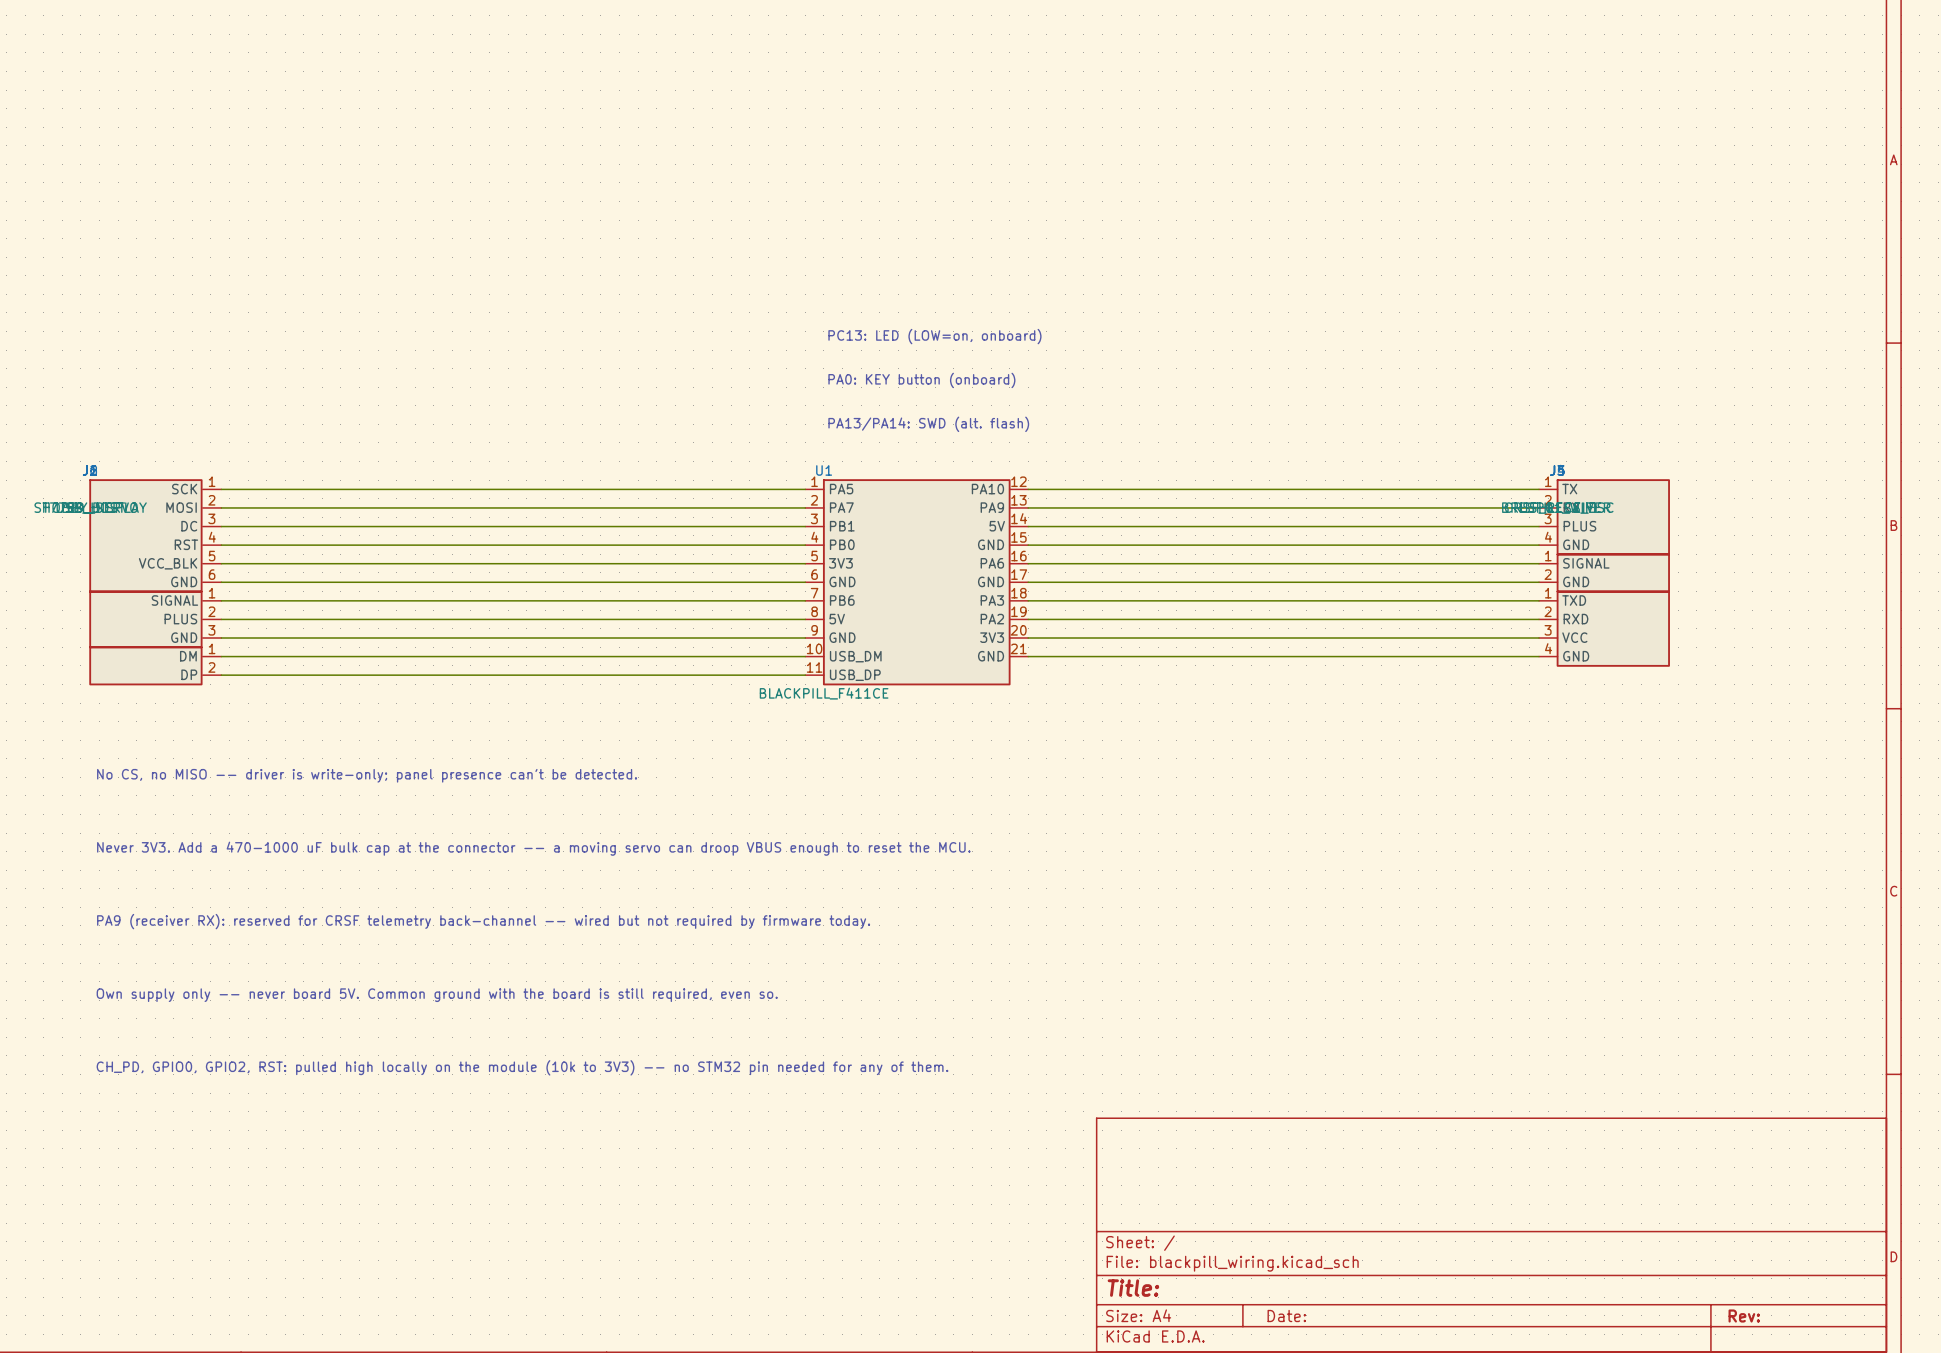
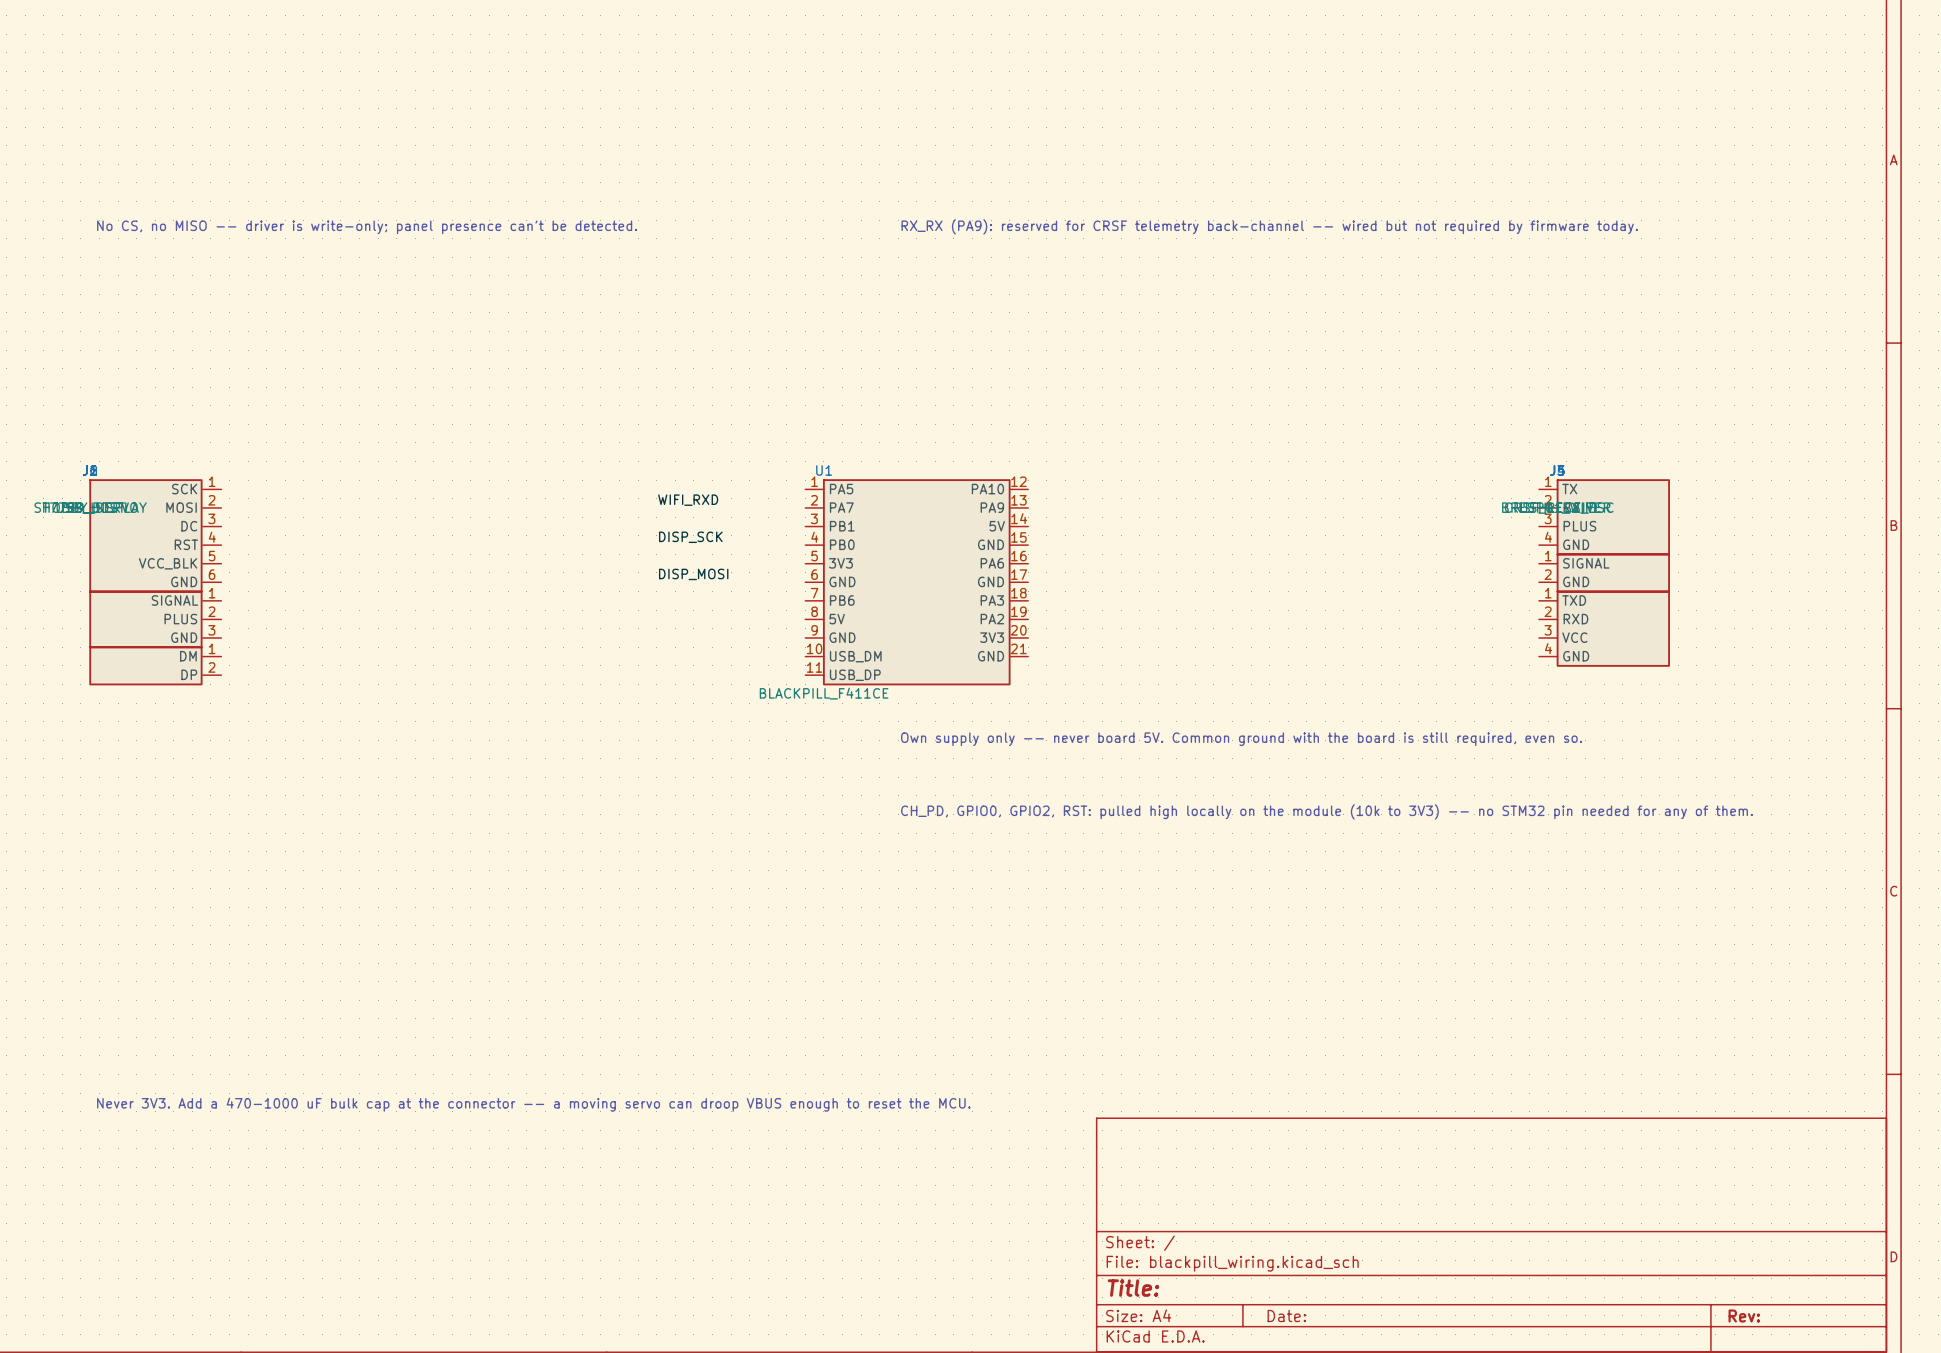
text: none -> RX_RX (PA9): reserved for CRSF telemetry back-channel -- wired but not required by firmware today. (1269, 226)
text: none -> No CS, no MISO -- driver is write-only; panel presence can't be detected. (367, 227)
text: PC13: LED (LOW=on, onboard) (934, 336) -> none
text: PA0: KEY button (onboard) (921, 380) -> none
text: PA13/PA14: SWD (alt. flash) (928, 424) -> none
wire: (221, 489) (805, 489) -> none
wire: (1028, 489) (1539, 489) -> none
label: none -> WIFI_RXD (688, 500)
wire: (221, 507) (805, 507) -> none
wire: (1028, 507) (1539, 507) -> none
wire: (221, 526) (805, 526) -> none
wire: (1028, 526) (1539, 526) -> none
label: none -> DISP_SCK (690, 537)
wire: (221, 545) (805, 545) -> none
wire: (1028, 545) (1539, 545) -> none
wire: (221, 563) (805, 563) -> none
wire: (1028, 563) (1539, 563) -> none
label: none -> DISP_MOSI (693, 574)
wire: (221, 582) (805, 582) -> none
wire: (1028, 582) (1539, 582) -> none
wire: (221, 600) (805, 600) -> none
wire: (1028, 600) (1539, 600) -> none
wire: (221, 619) (805, 619) -> none
wire: (1028, 619) (1539, 619) -> none
wire: (221, 638) (805, 638) -> none
wire: (1028, 638) (1539, 638) -> none
wire: (221, 656) (805, 656) -> none
wire: (1028, 656) (1539, 656) -> none
wire: (221, 675) (805, 675) -> none
text: none -> Own supply only -- never board 5V. Common ground with the board is still required, even so. (1241, 739)
text: No CS, no MISO -- driver is write-only; panel presence can't be detected. (367, 775) -> none
text: none -> CH_PD, GPIO0, GPIO2, RST: pulled high locally on the module (10k to 3V3) -- no STM32 pin needed for any of them. (1326, 811)
text: Never 3V3. Add a 470-1000 uF bulk cap at the connector -- a moving servo can droop VBUS enough to reset the MCU. (533, 848) -> none
text: PA9 (receiver RX): reserved for CRSF telemetry back-channel -- wired but not required by firmware today. (483, 921) -> none
text: Own supply only -- never board 5V. Common ground with the board is still required, even so. (437, 995) -> none
text: CH_PD, GPIO0, GPIO2, RST: pulled high locally on the module (10k to 3V3) -- no STM32 pin needed for any of them. (522, 1067) -> none
text: none -> Never 3V3. Add a 470-1000 uF bulk cap at the connector -- a moving servo can droop VBUS enough to reset the MCU. (533, 1104)

